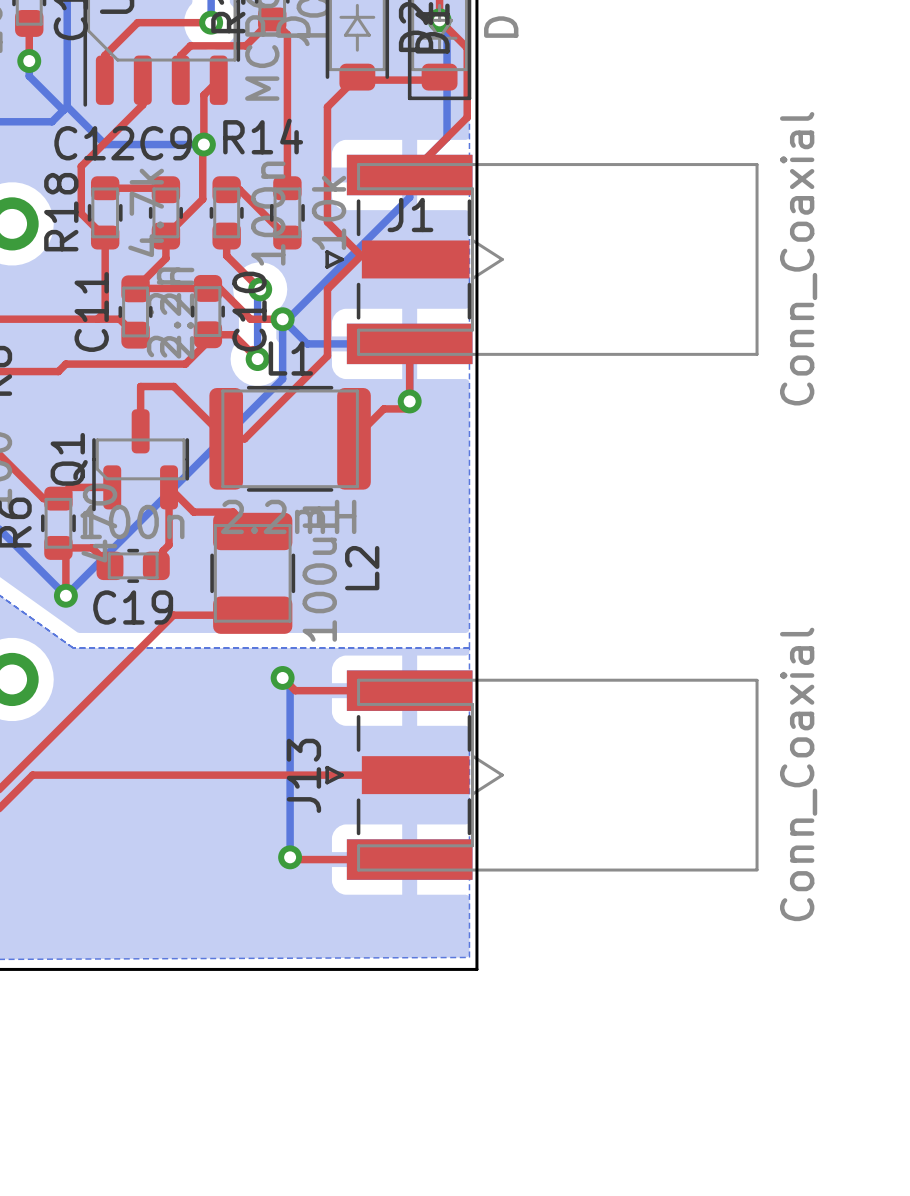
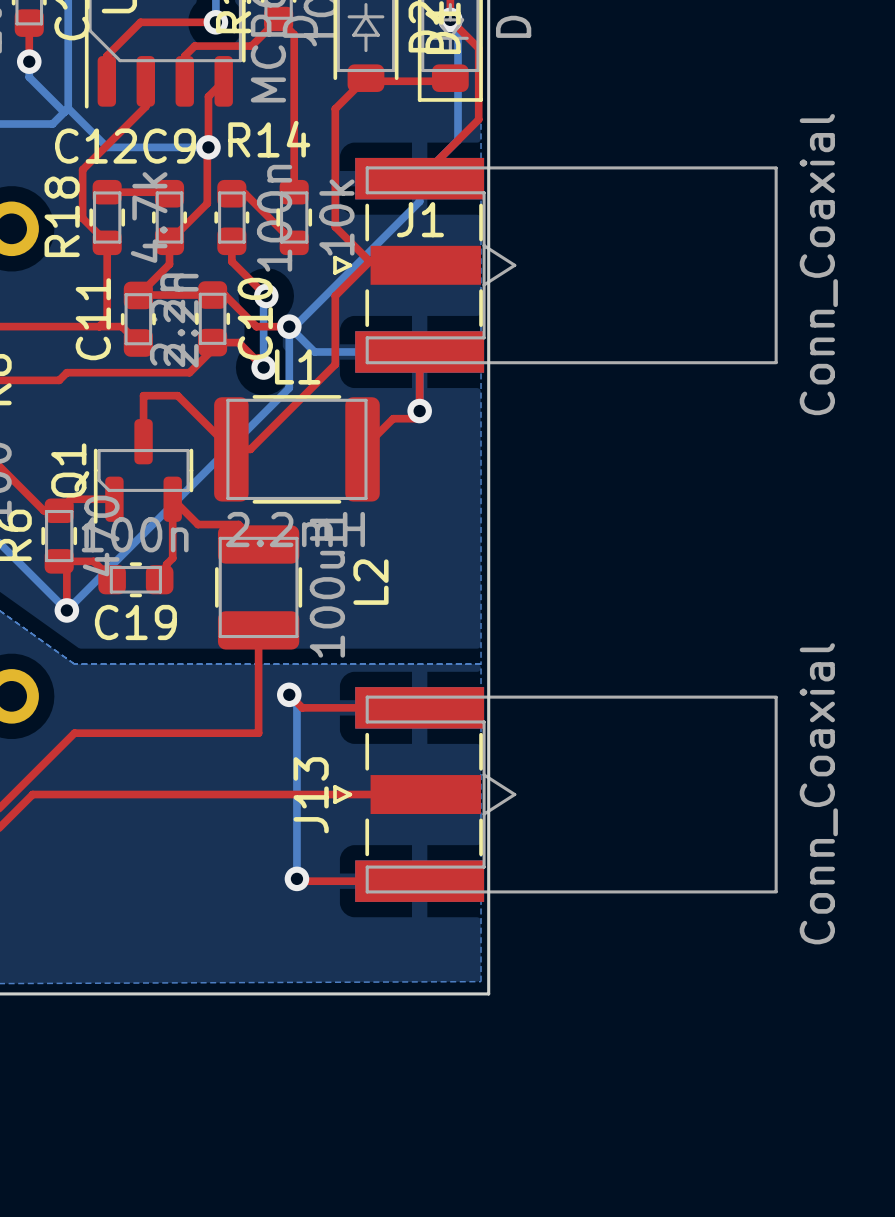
top track: (252, 615) (173, 615) (73, 715) -> (258, 630) (258, 733) (74, 733)

